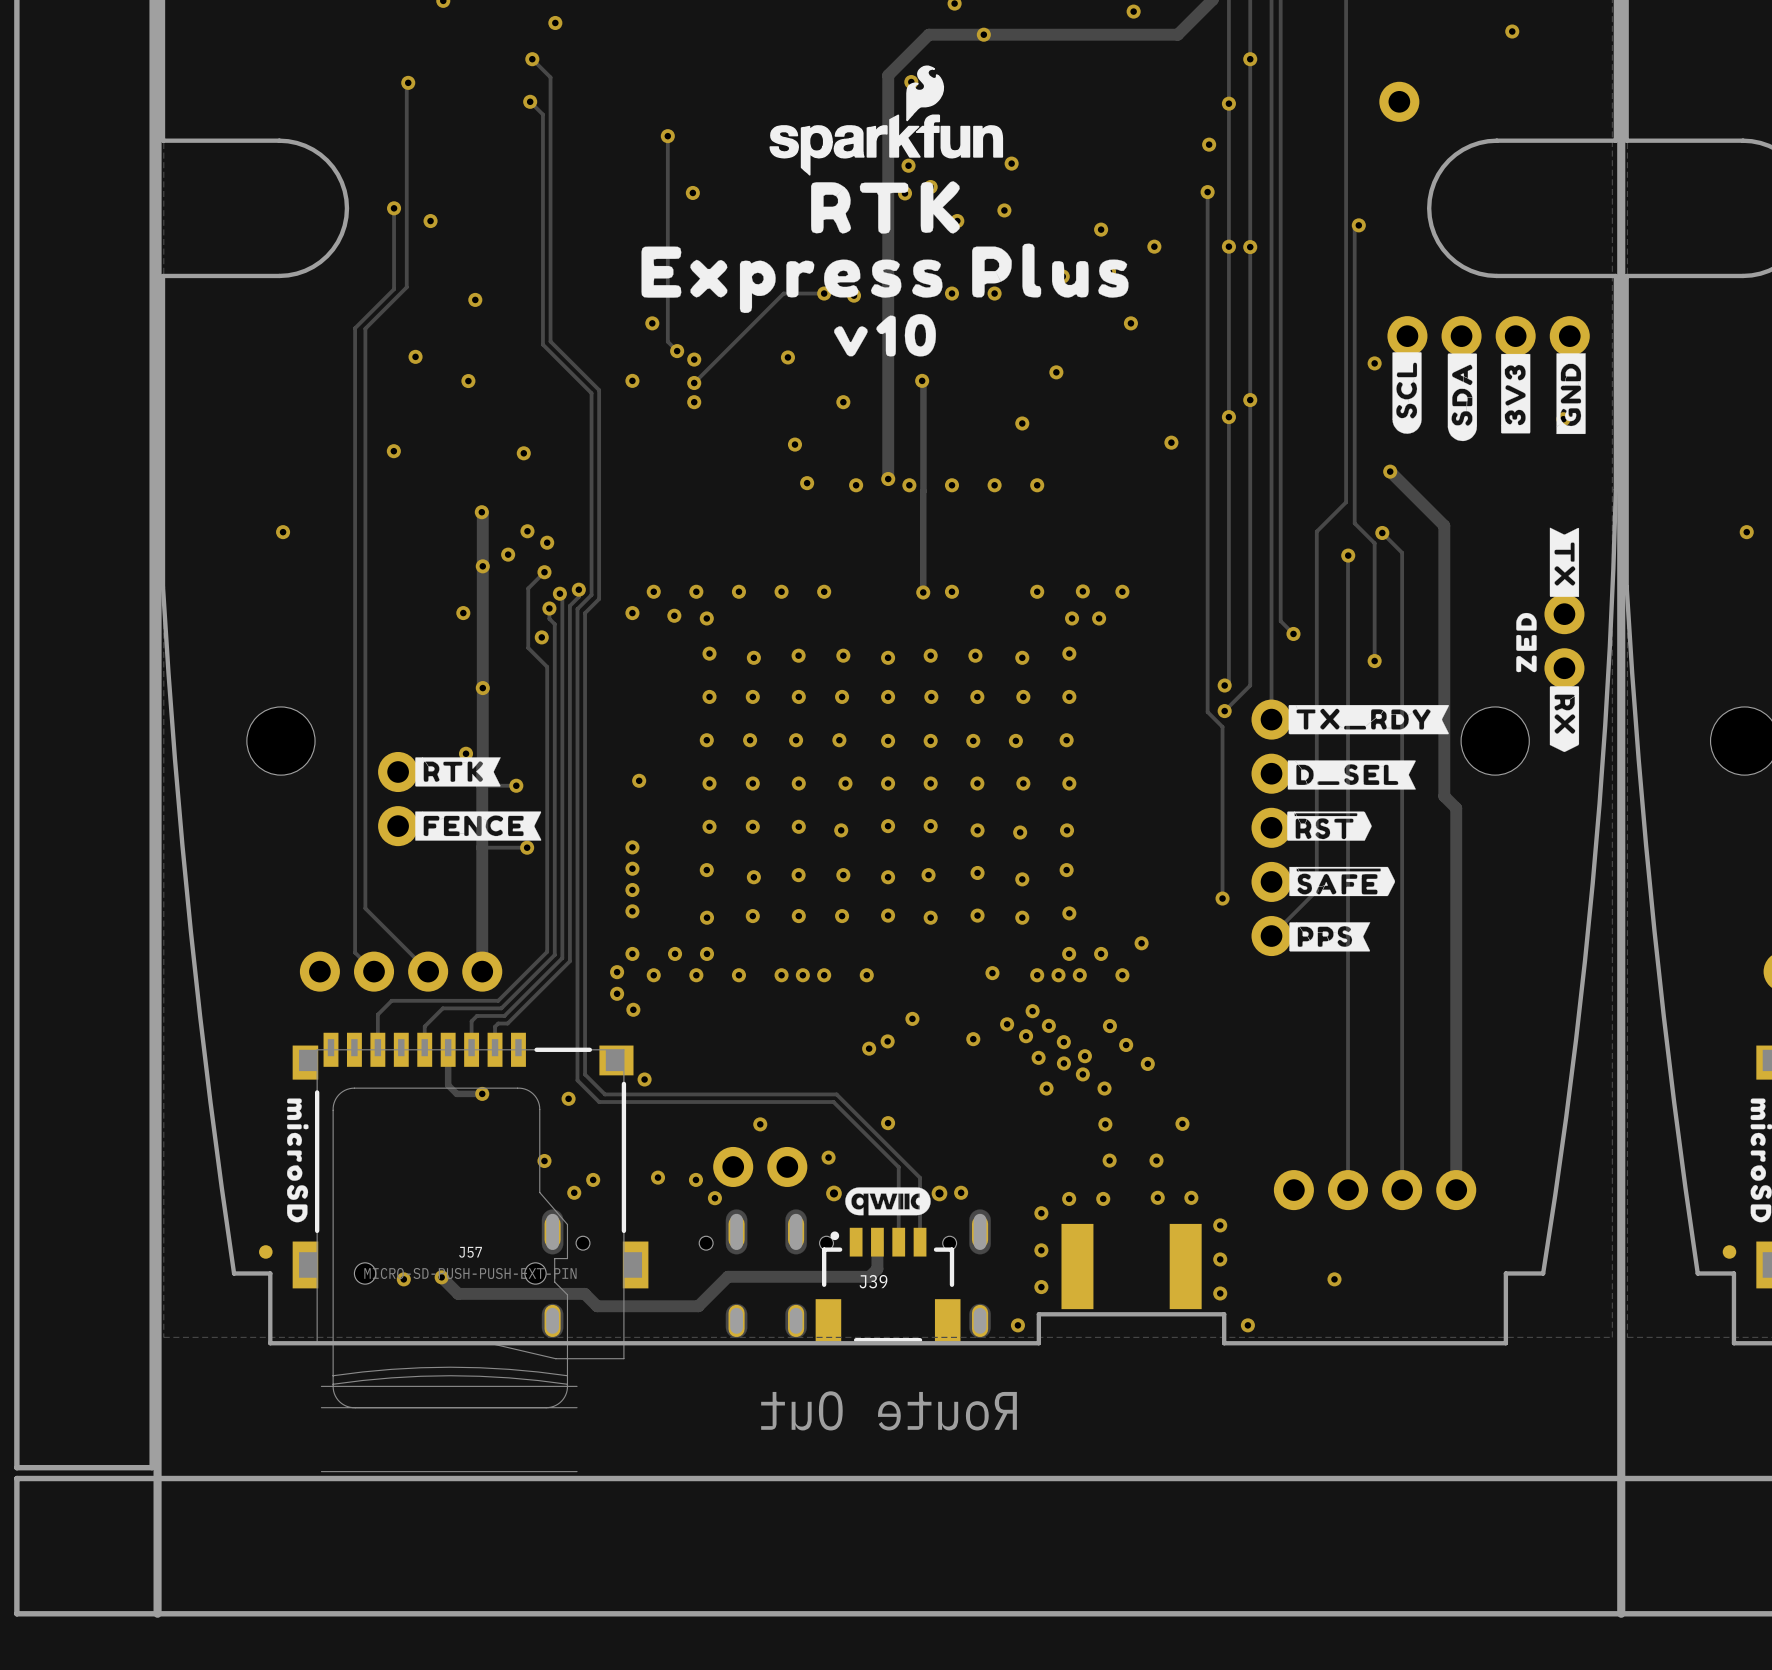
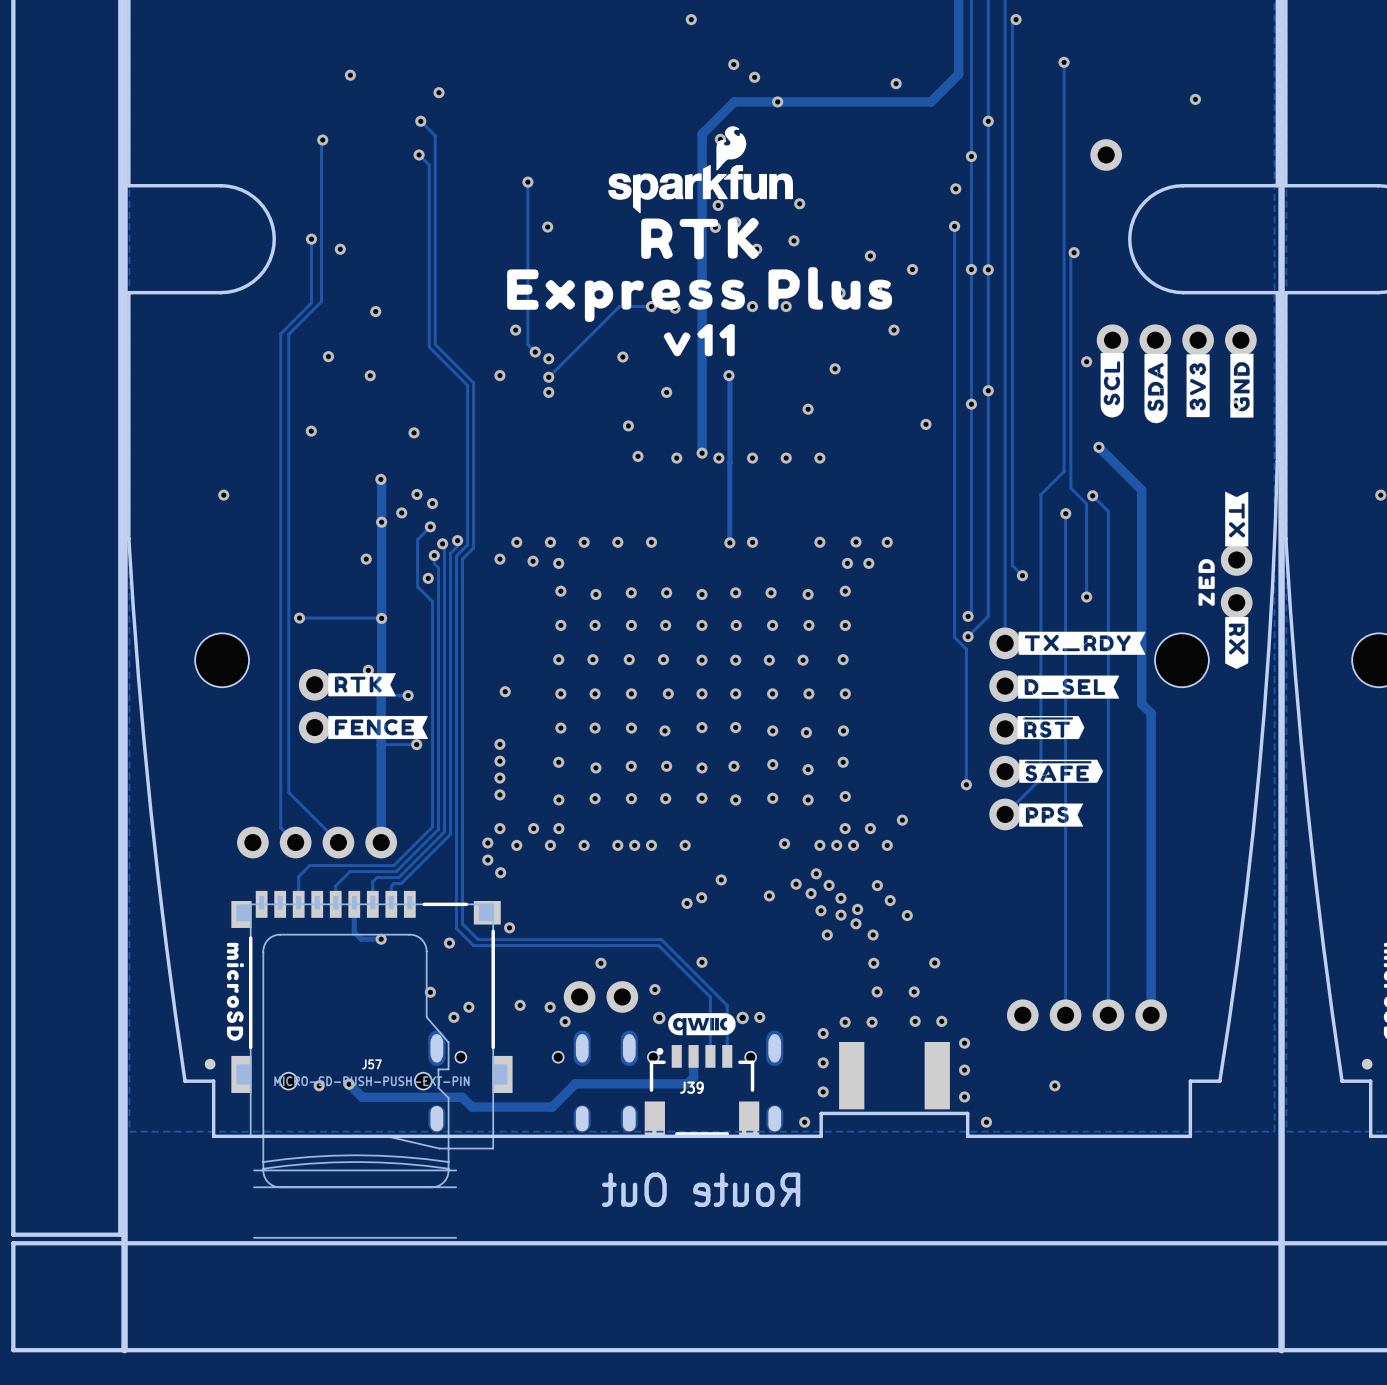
drawing shape: [834, 314, 936, 357] -> [663, 323, 735, 357]
track: none -> (299, 618) (381, 618)
via: none -> (299, 618)

